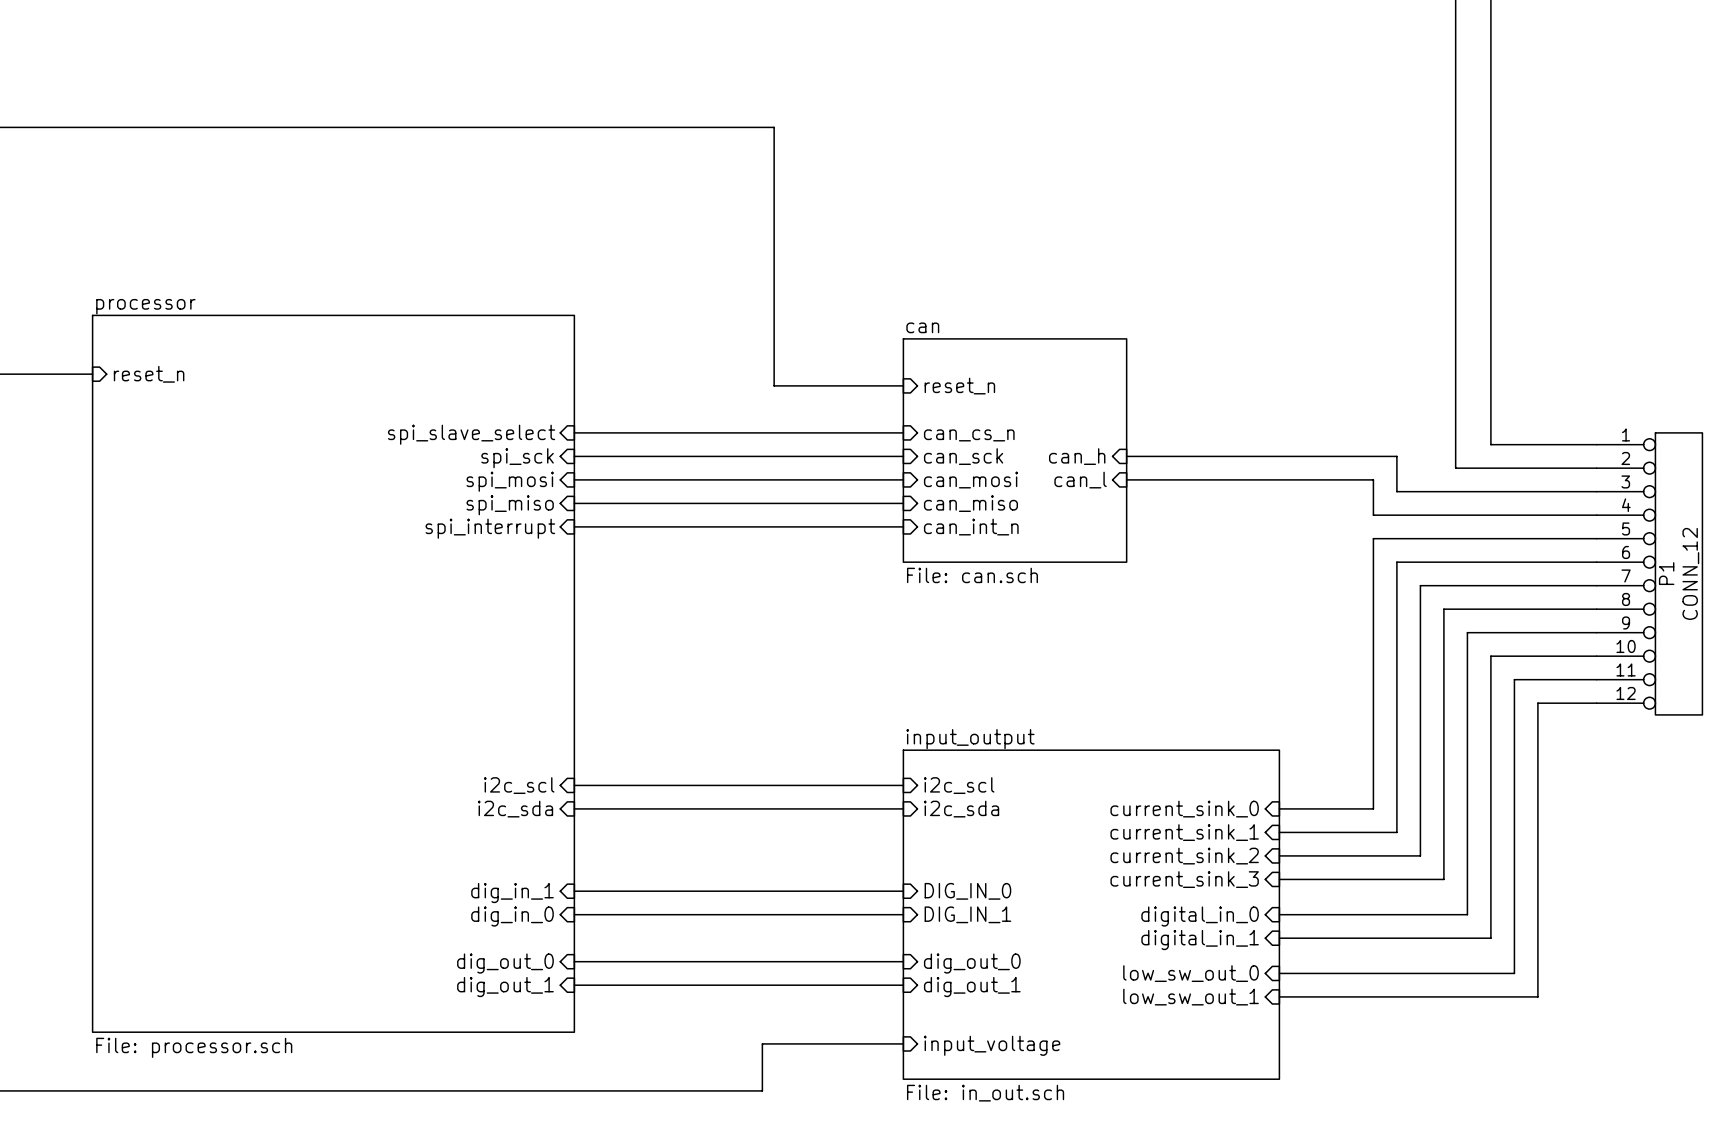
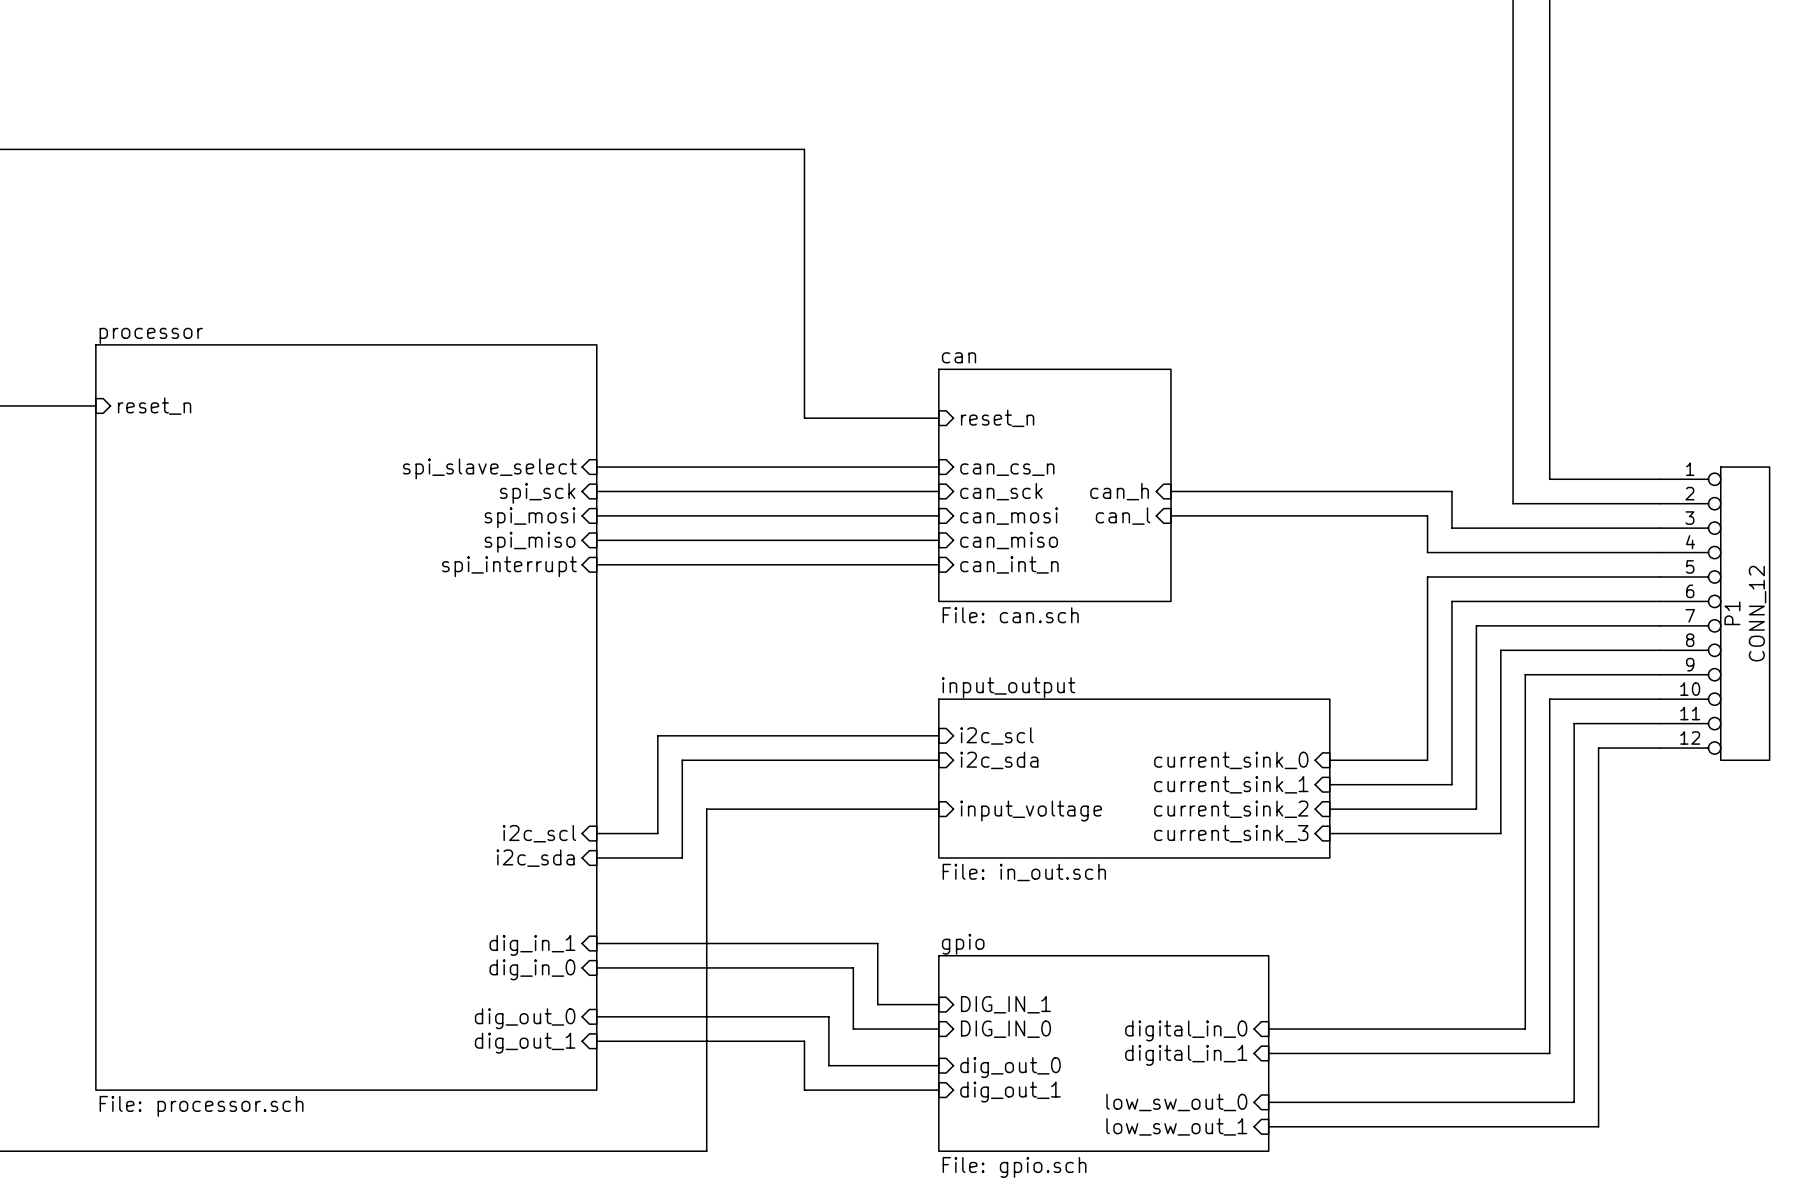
wire: (1373, 714) (1373, 808) (1279, 808) -> (1427, 760) (1329, 760)
sheet input_output: none -> File: in_out.sch (1134, 778)
wire: (1396, 738) (1396, 832) (1279, 832) -> (1451, 784) (1329, 784)
wire: (1420, 761) (1420, 855) (1279, 855) -> (1476, 809) (1329, 809)
sheet pin: none -> input_voltage (1031, 811)
wire: (633, 785) (903, 785) -> (657, 833) (657, 735) (938, 735)
sheet pin position: i2c_scl (959, 785) -> i2c_scl (996, 735)
wire: (1443, 785) (1443, 879) (1279, 879) -> (1500, 833) (1329, 833)
wire: (656, 808) (903, 808) -> (682, 857) (682, 760) (938, 760)
sheet pin position: i2c_sda (961, 809) -> i2c_sda (999, 760)
sheet pin position: current_sink_0 (1184, 809) -> current_sink_0 (1231, 760)
sheet pin position: current_sink_1 (1184, 832) -> current_sink_1 (1231, 784)
sheet pin position: current_sink_2 (1184, 856) -> current_sink_2 (1231, 809)
sheet pin position: current_sink_3 (1184, 879) -> current_sink_3 (1231, 833)
wire: (844, 891) (903, 891) -> (877, 943) (877, 1004) (938, 1004)
sheet pin position: DIG_IN_0 (967, 891) -> DIG_IN_0 (1005, 1029)
wire: (821, 914) (903, 914) -> (853, 967) (853, 1029) (938, 1029)
sheet pin position: DIG_IN_1 (967, 914) -> DIG_IN_1 (1005, 1004)
sheet input_output: File: in_out.sch (1091, 914) -> none
wire: (1279, 914) (1467, 914) -> none
sheet pin position: digital_in_0 (1200, 916) -> digital_in_0 (1186, 1030)
wire: (1279, 938) (1490, 938) -> none
sheet pin position: digital_in_1 (1200, 940) -> digital_in_1 (1186, 1055)
wire: (797, 961) (903, 961) -> (828, 1016) (828, 1065) (938, 1065)
sheet pin position: dig_out_0 (972, 963) -> dig_out_0 (1010, 1067)
sheet pin position: low_sw_out_0 (1191, 973) -> low_sw_out_0 (1176, 1102)
wire: none -> (1268, 1029) (1329, 1029)
wire: (1467, 973) (1514, 973) -> (1525, 1029) (1525, 967)
wire: none -> (1574, 1029) (1574, 1102) (1268, 1102)
wire: (774, 985) (903, 985) -> (804, 1041) (804, 1090) (938, 1090)
sheet pin position: dig_out_1 (972, 987) -> dig_out_1 (1010, 1092)
sheet gpio: none -> File: gpio.sch (1103, 1053)
wire: none -> (1268, 1053) (1329, 1053)
wire: (1490, 996) (1537, 996) -> (1549, 1053) (1549, 992)
wire: none -> (1598, 1053) (1598, 1126) (1268, 1126)
sheet pin position: low_sw_out_1 (1191, 997) -> low_sw_out_1 (1176, 1126)
wire: (903, 1043) (762, 1043) (762, 1090) (680, 1090) -> (938, 809) (706, 809) (706, 1151)
sheet pin: input_voltage (992, 1045) -> none

